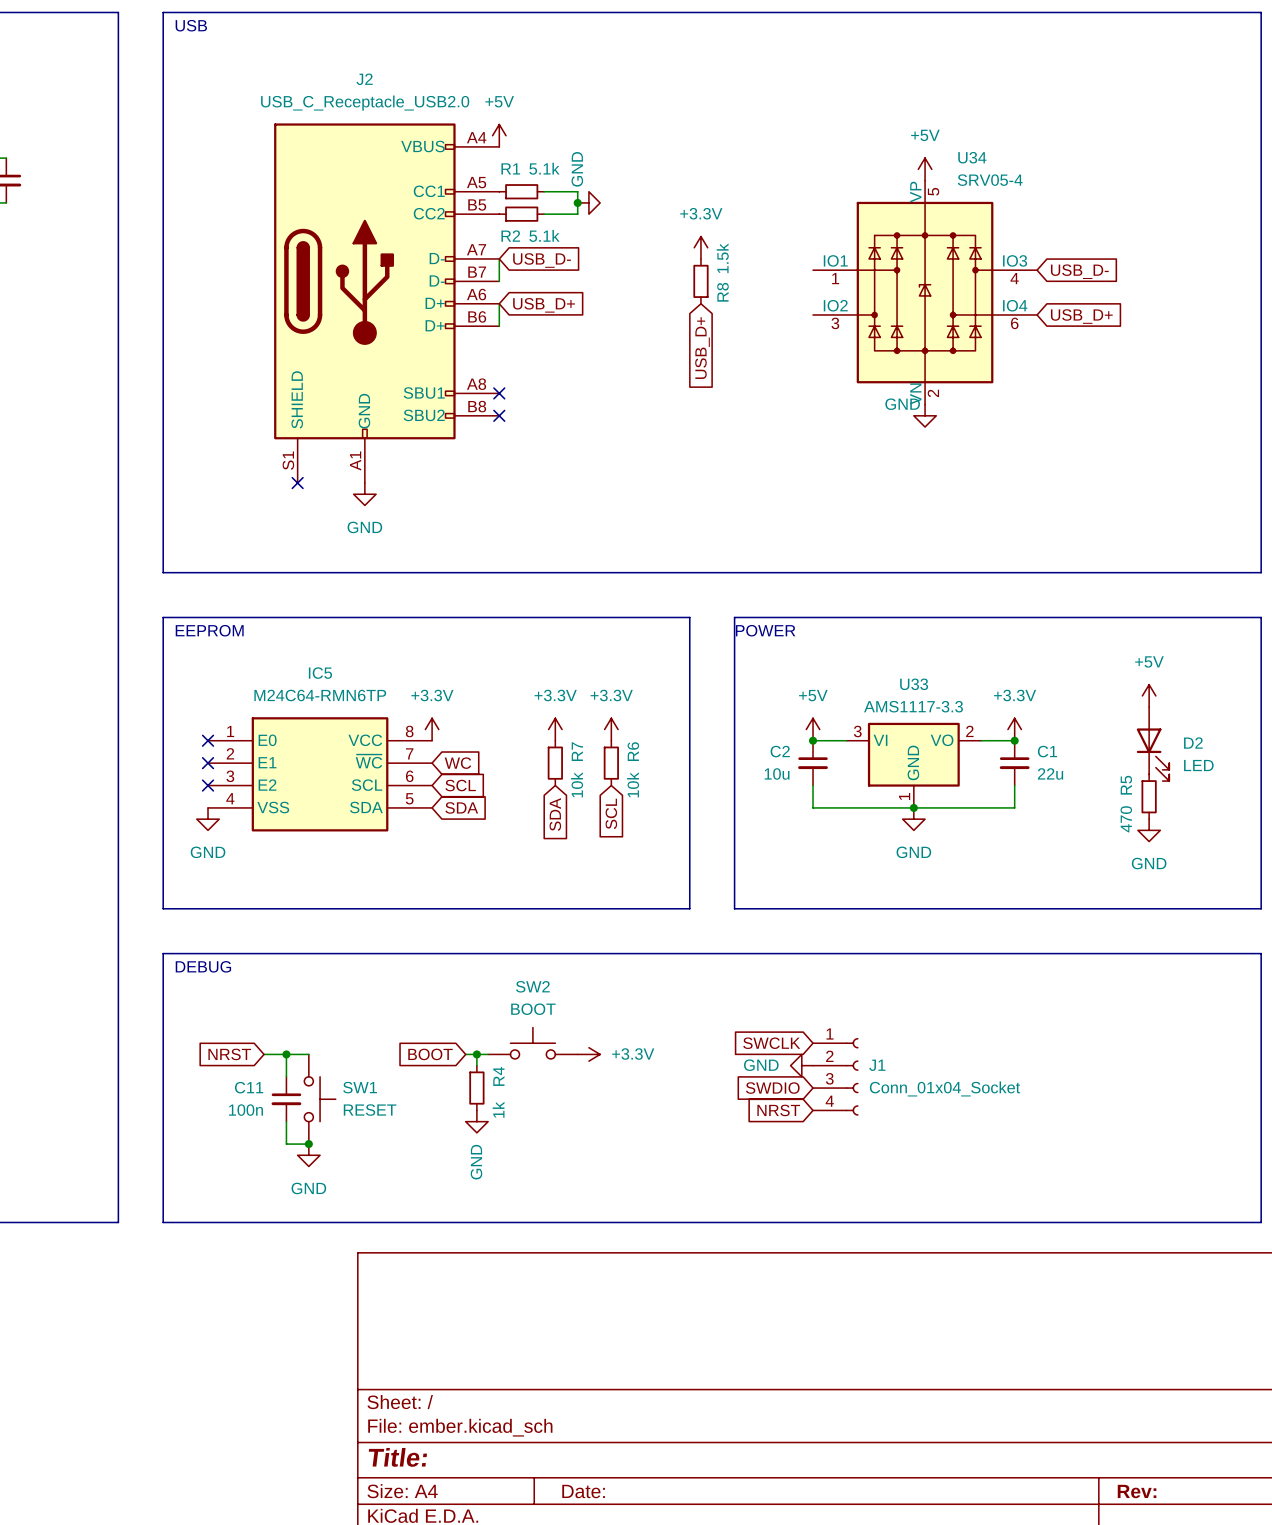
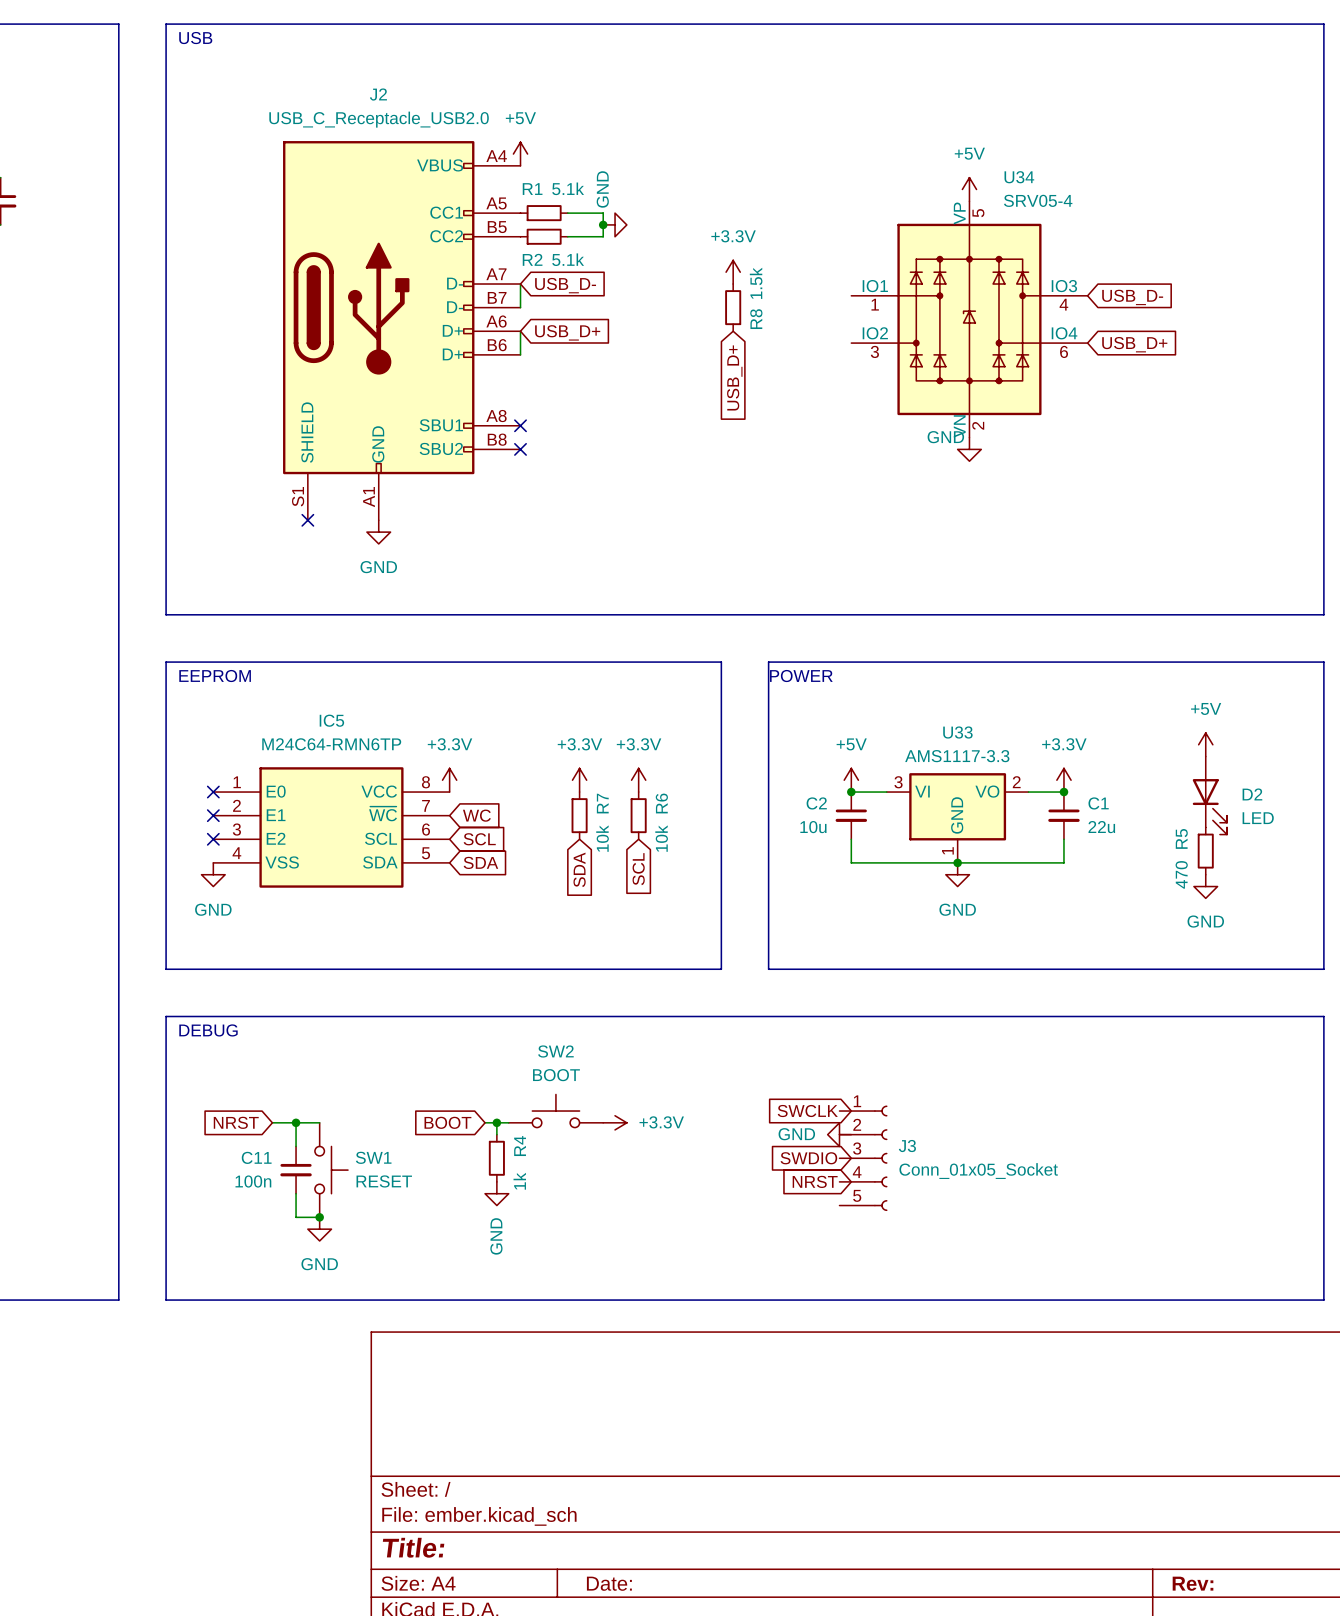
J1: Conn_01x04_Socket (835, 1076) -> none
J3: none -> Conn_01x05_Socket (863, 1158)

